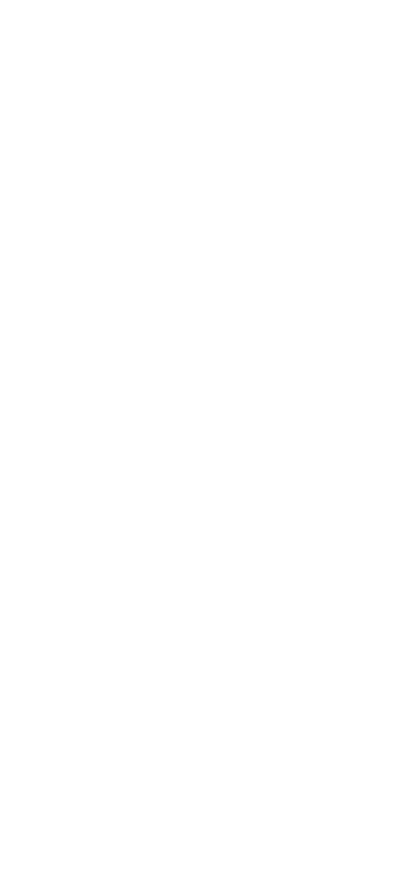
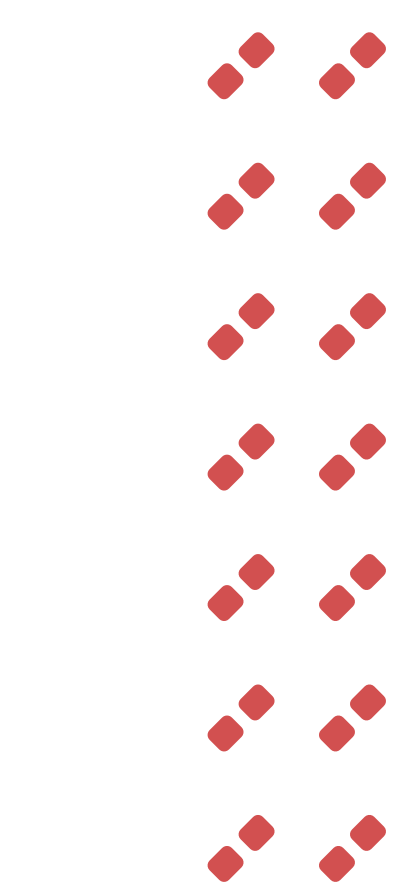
part: none -> (241, 65)
part: none -> (352, 65)
part: none -> (241, 196)
part: none -> (352, 196)
part: none -> (241, 326)
part: none -> (352, 326)
part: none -> (241, 457)
part: none -> (352, 457)
part: none -> (241, 587)
part: none -> (352, 587)
part: none -> (241, 717)
part: none -> (352, 717)
part: none -> (241, 848)
part: none -> (352, 848)

